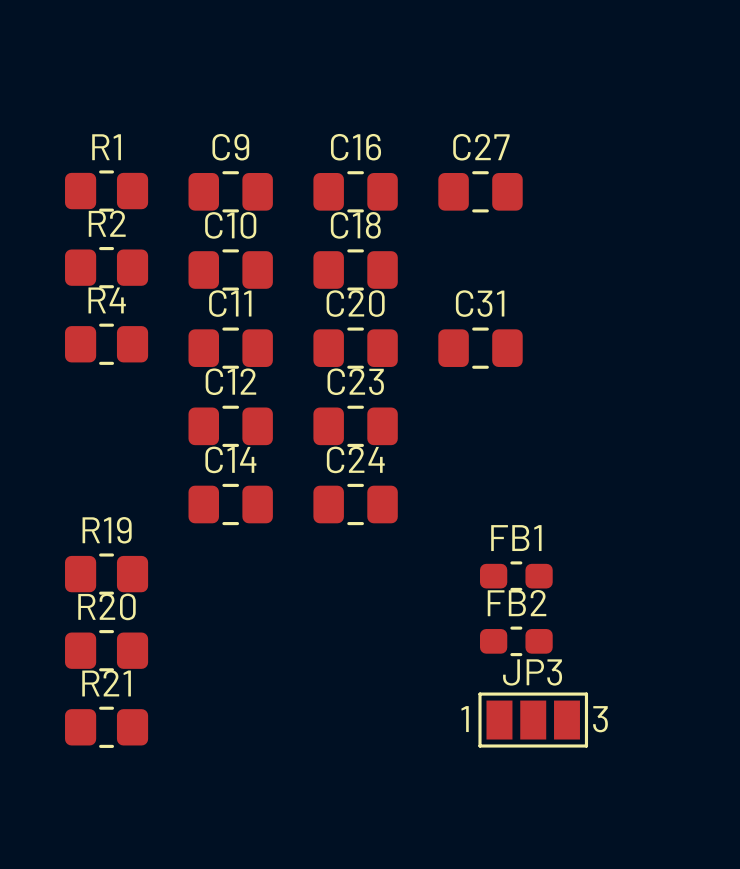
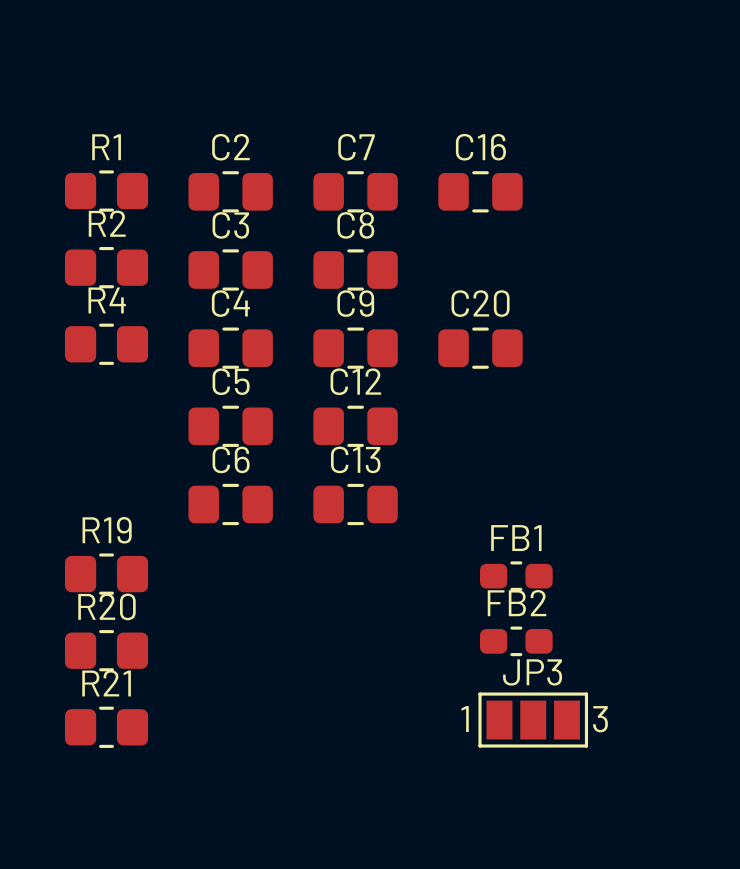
C9 name: C9 (230, 147) -> C2 (230, 147)
C16 name: C16 (356, 147) -> C7 (356, 147)
C27 name: C27 (481, 147) -> C16 (480, 147)
C10 name: C10 (230, 225) -> C3 (230, 225)
C18 name: C18 (355, 225) -> C8 (355, 225)
C11 name: C11 (230, 303) -> C4 (230, 303)
C20 name: C20 (355, 303) -> C9 (355, 303)
C31 name: C31 (480, 303) -> C20 (480, 303)
C12 name: C12 (230, 381) -> C5 (231, 381)
C23 name: C23 (355, 381) -> C12 (355, 381)
C14 name: C14 (230, 459) -> C6 (231, 459)
C24 name: C24 (355, 459) -> C13 (355, 459)

